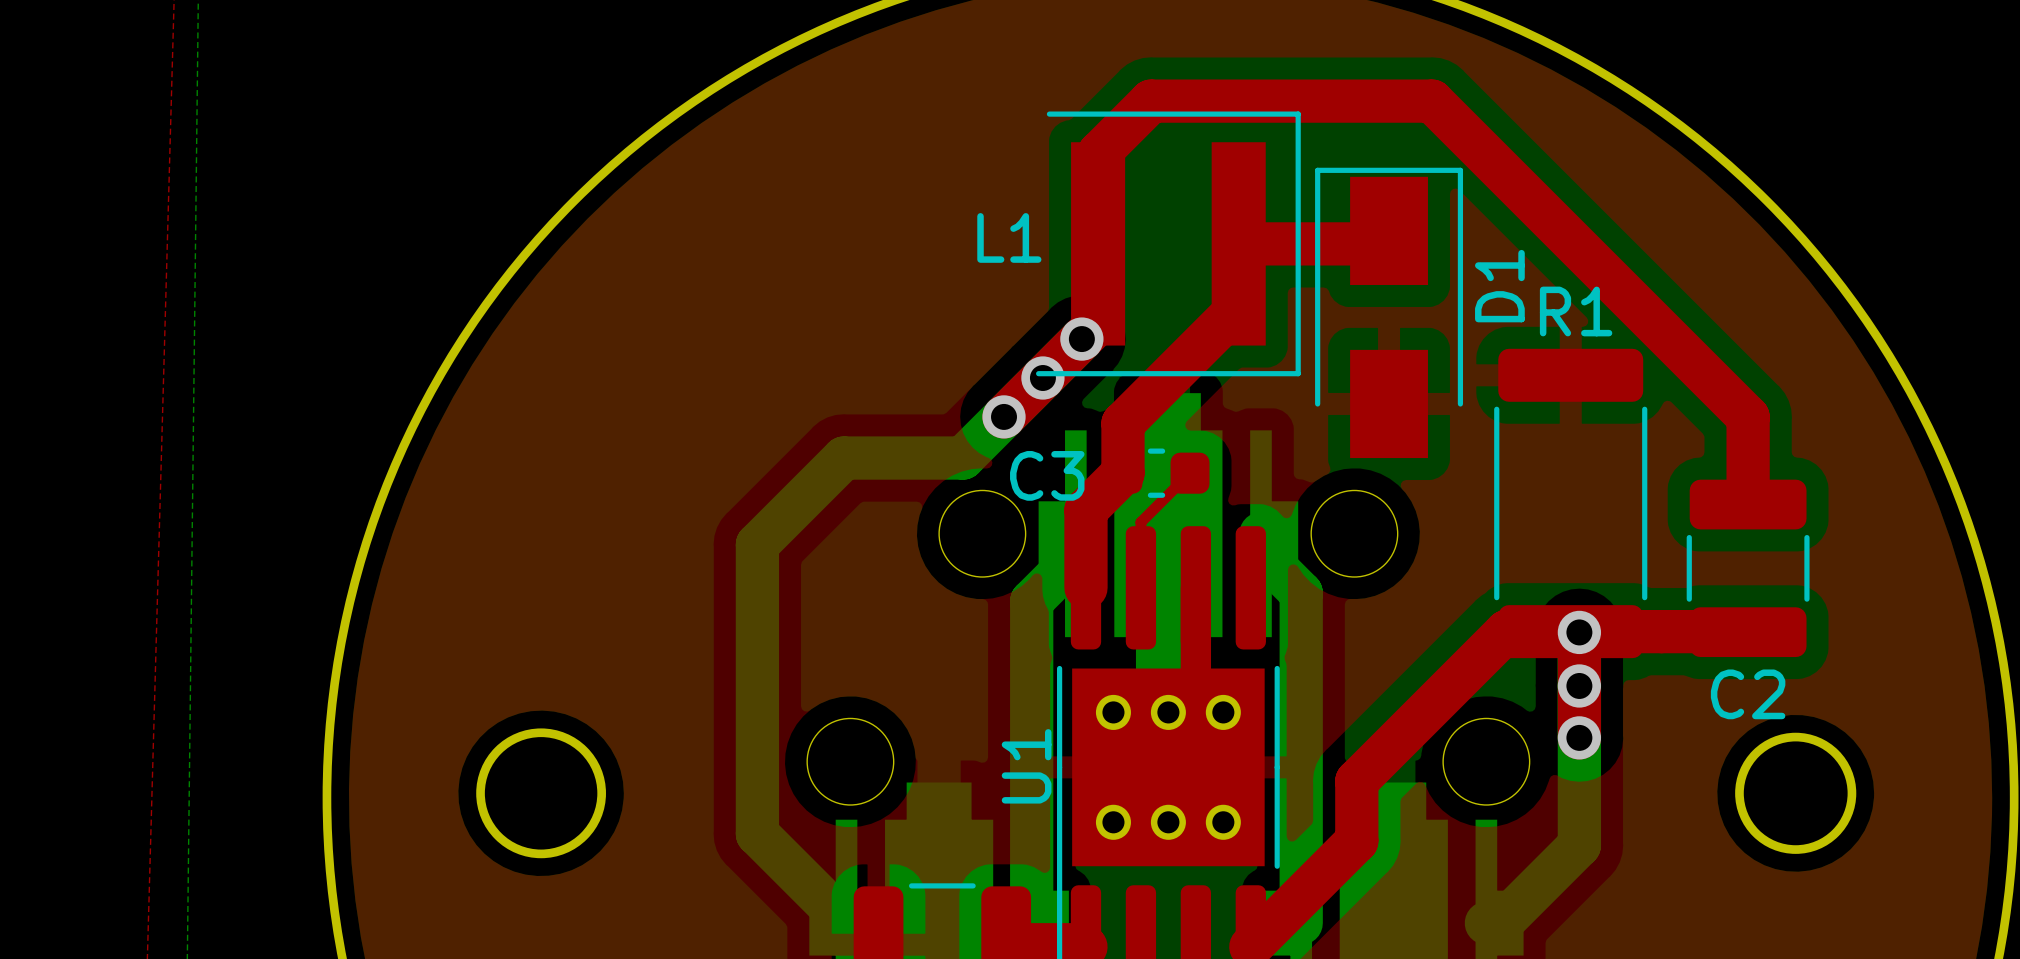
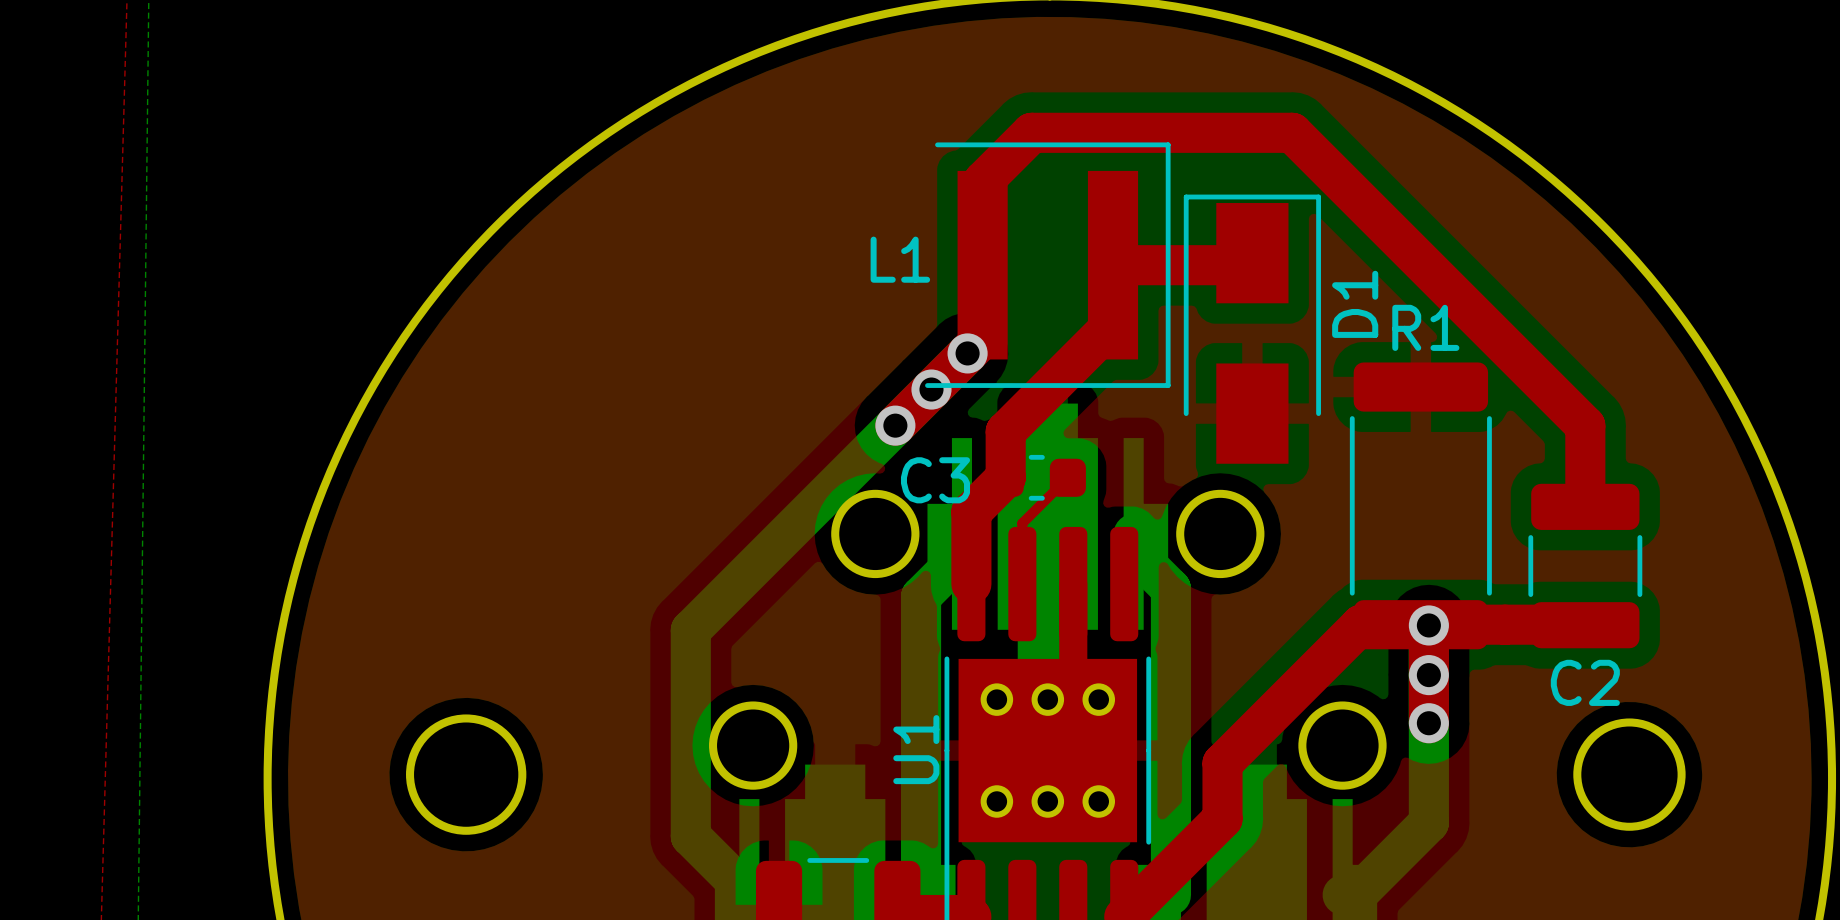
bottom track: (962, 458) (843, 458) (757, 544) (757, 833) (783, 859) -> (857, 463) (690, 630) (690, 836)
round board edge: none -> [831, 489, 920, 579]
round board edge: none -> [1176, 489, 1265, 579]
round board edge: none -> [709, 701, 798, 790]
round board edge: none -> [1298, 701, 1387, 790]

